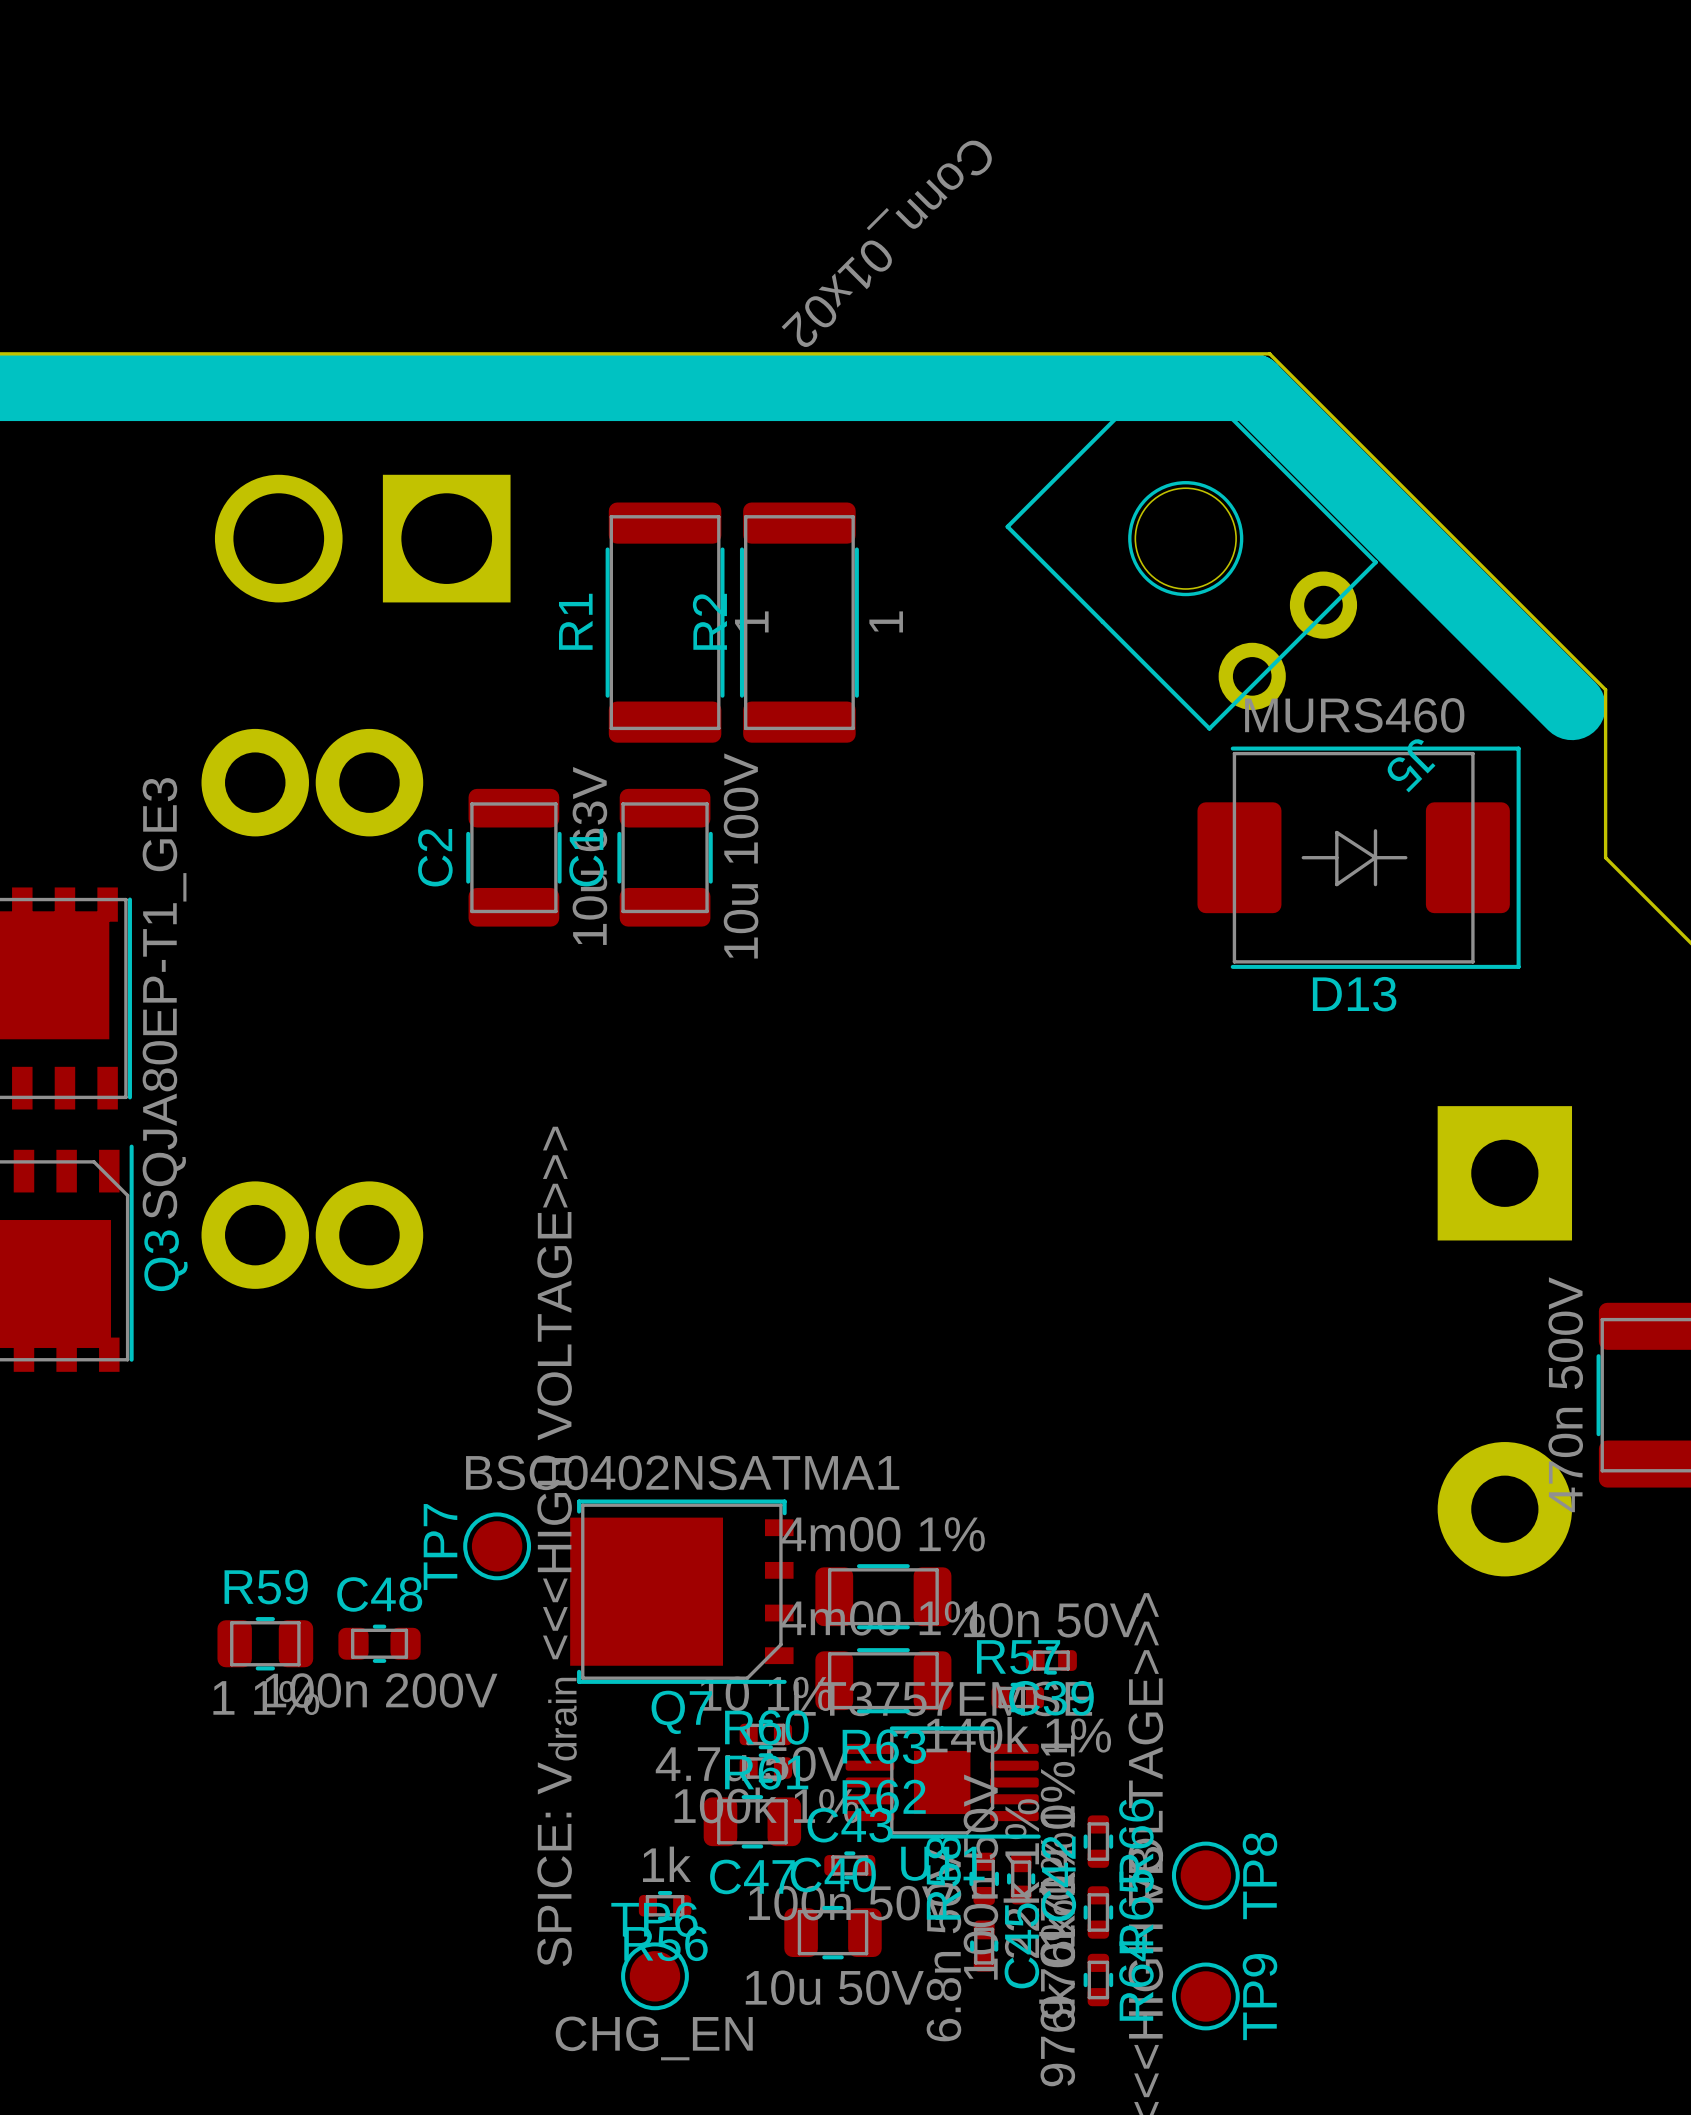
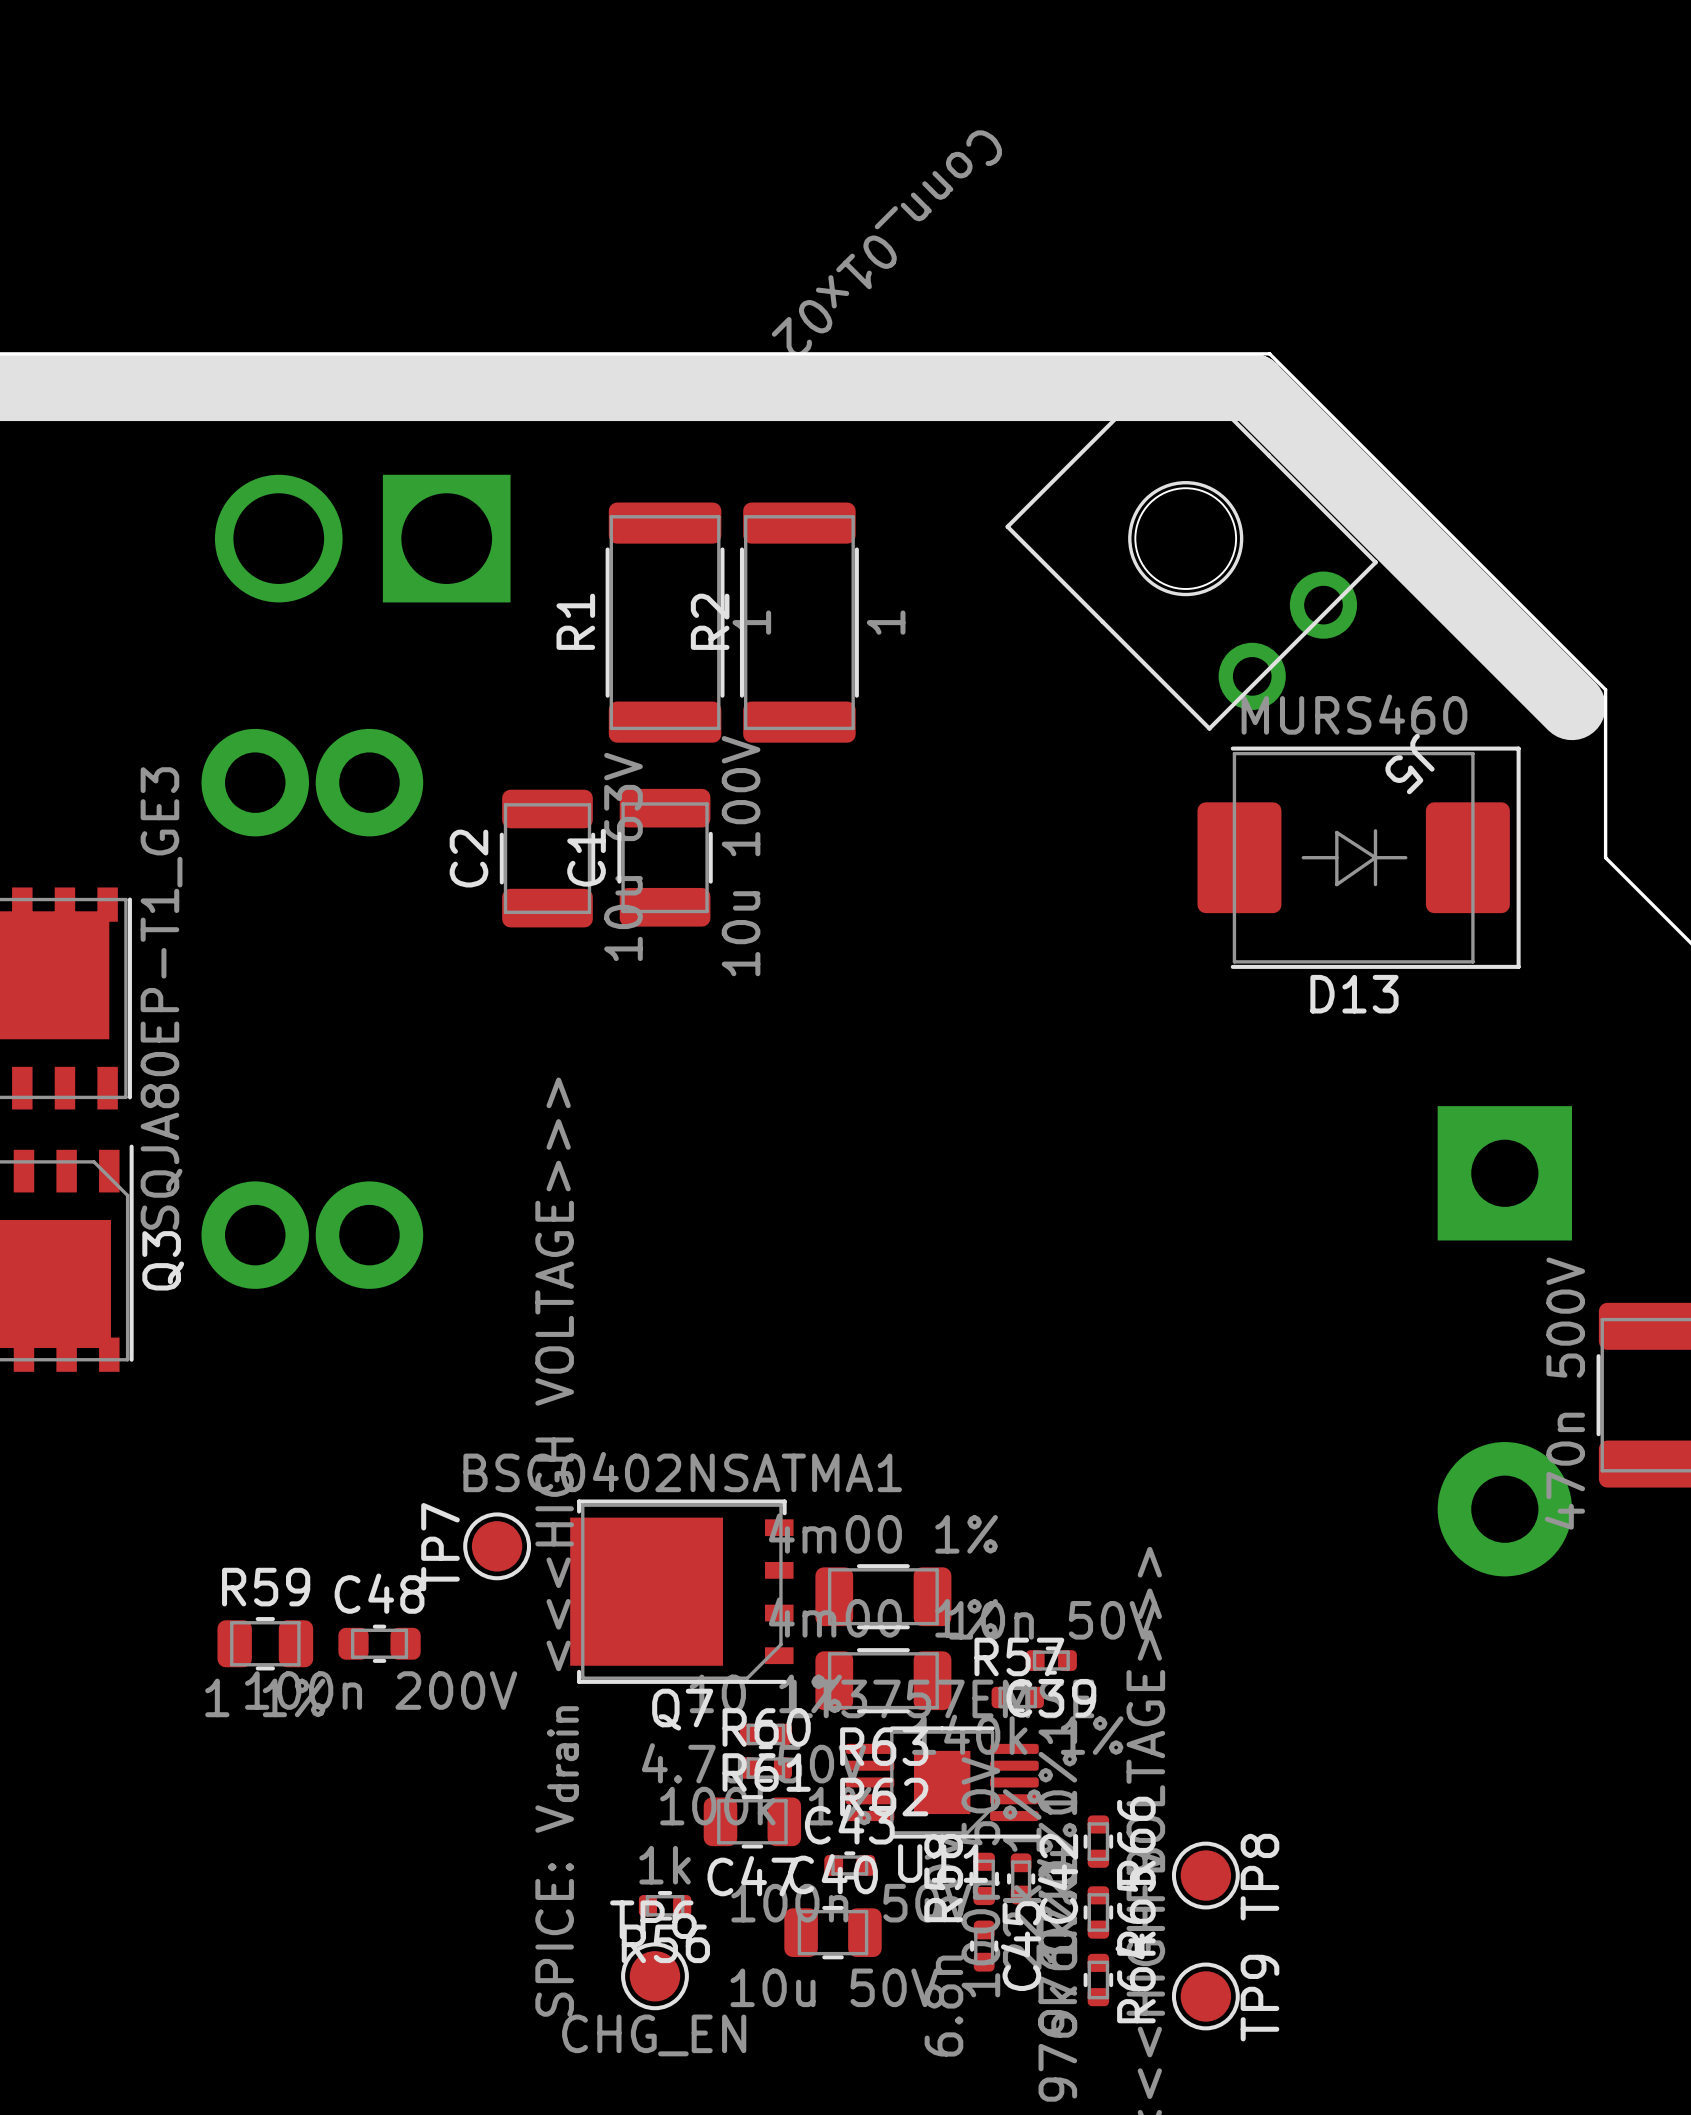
C2 position: (513, 857) -> (547, 858)

